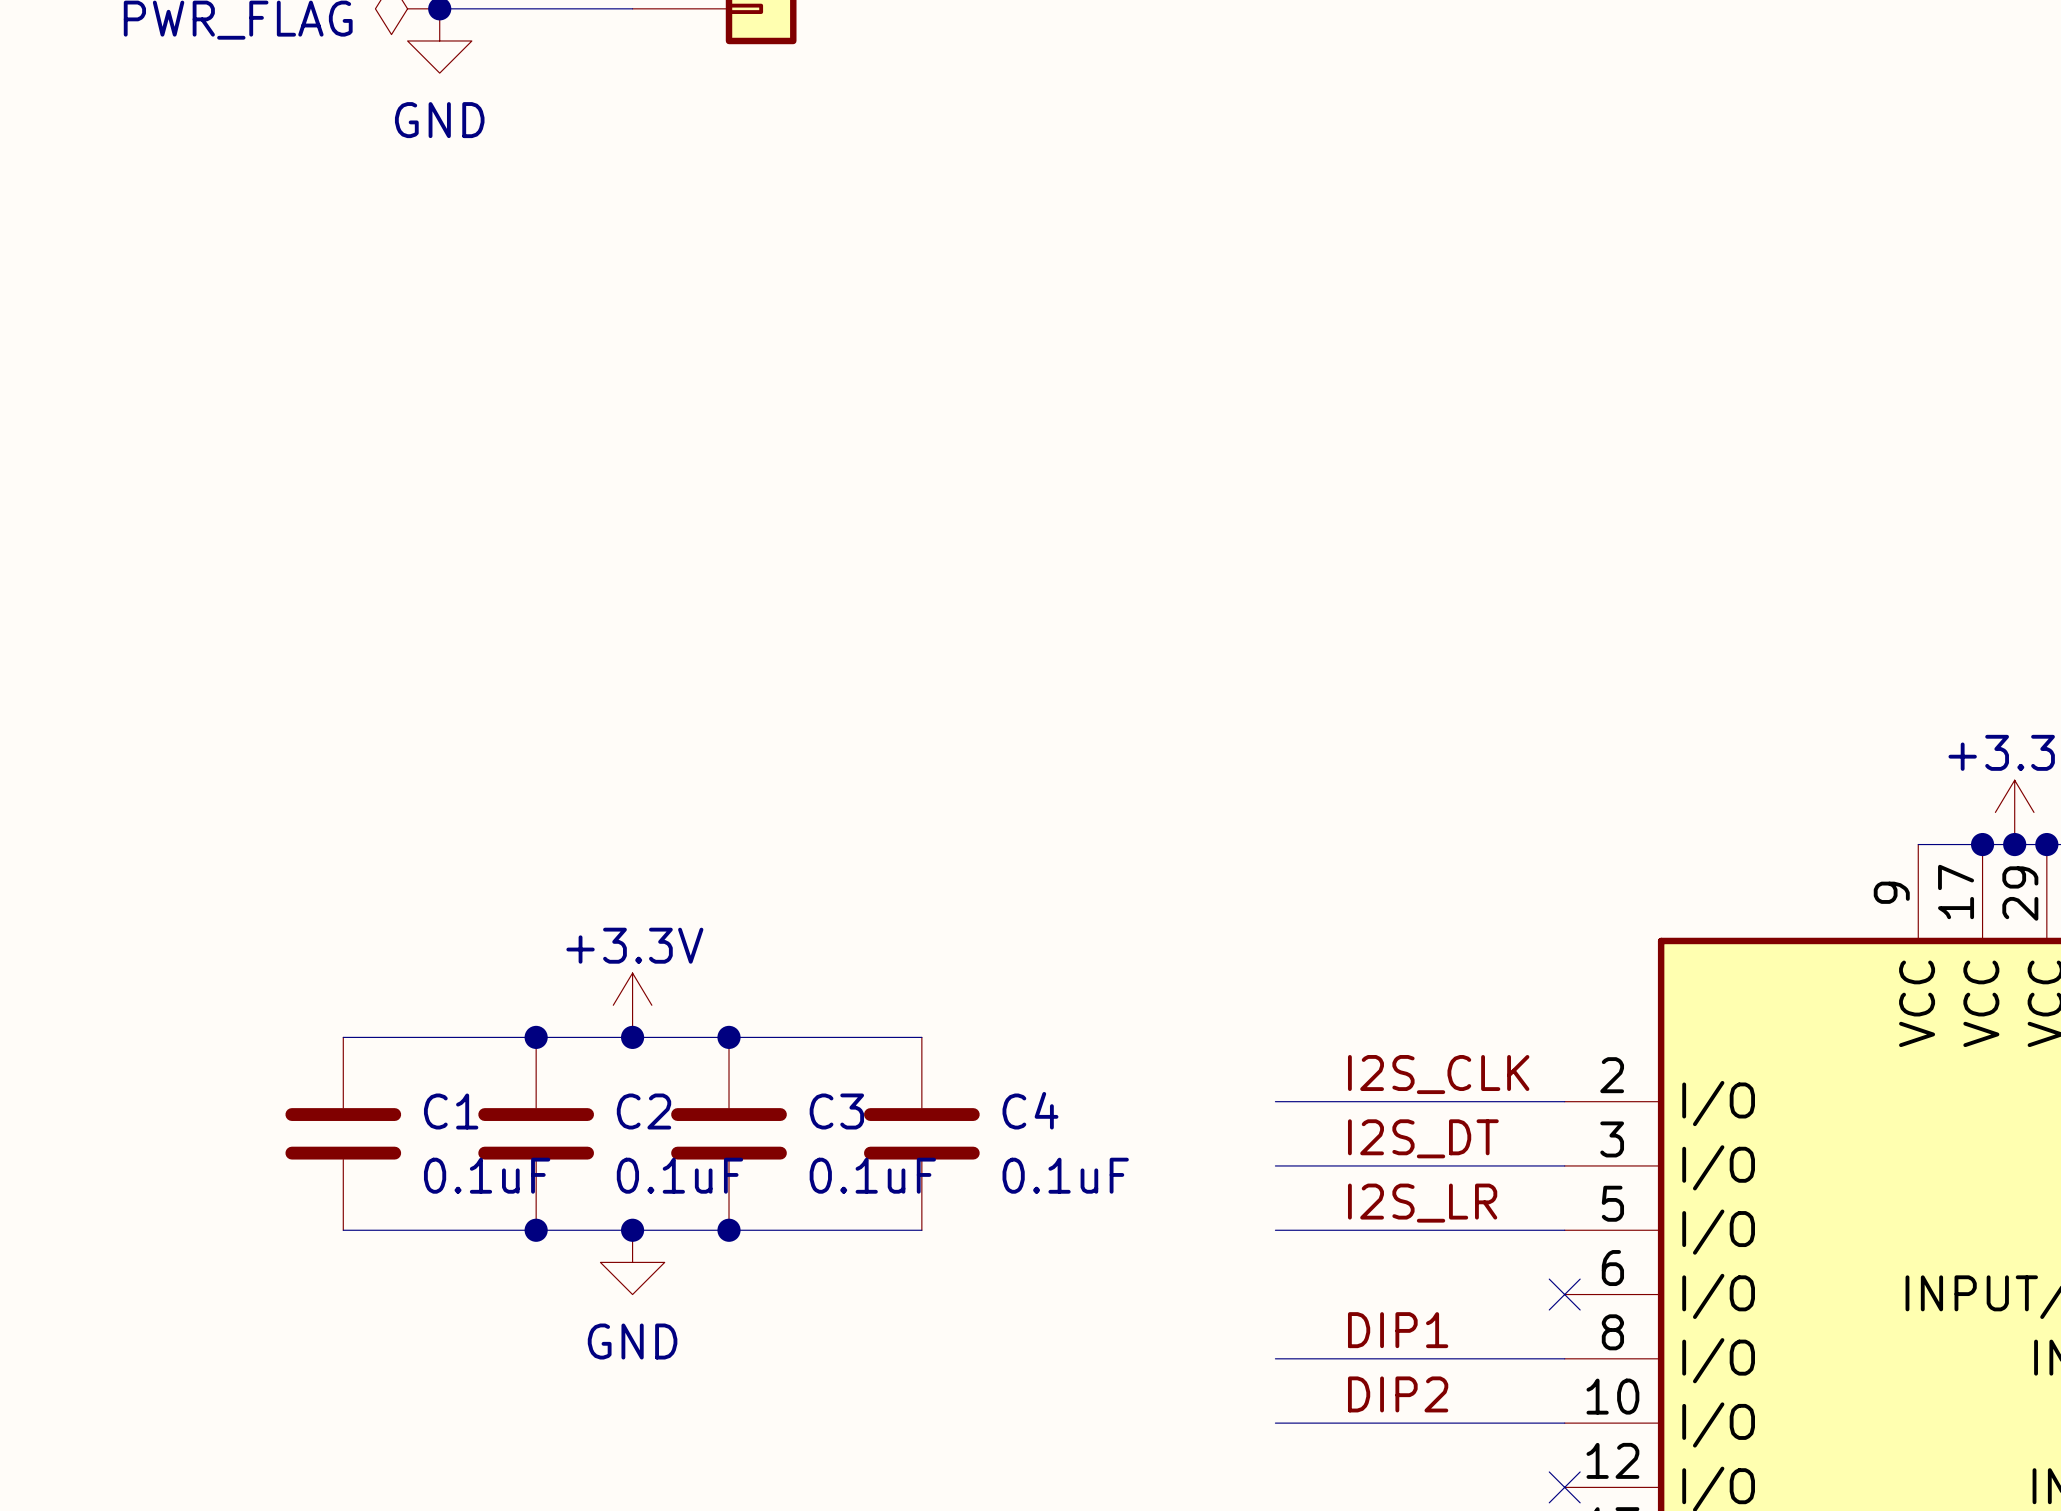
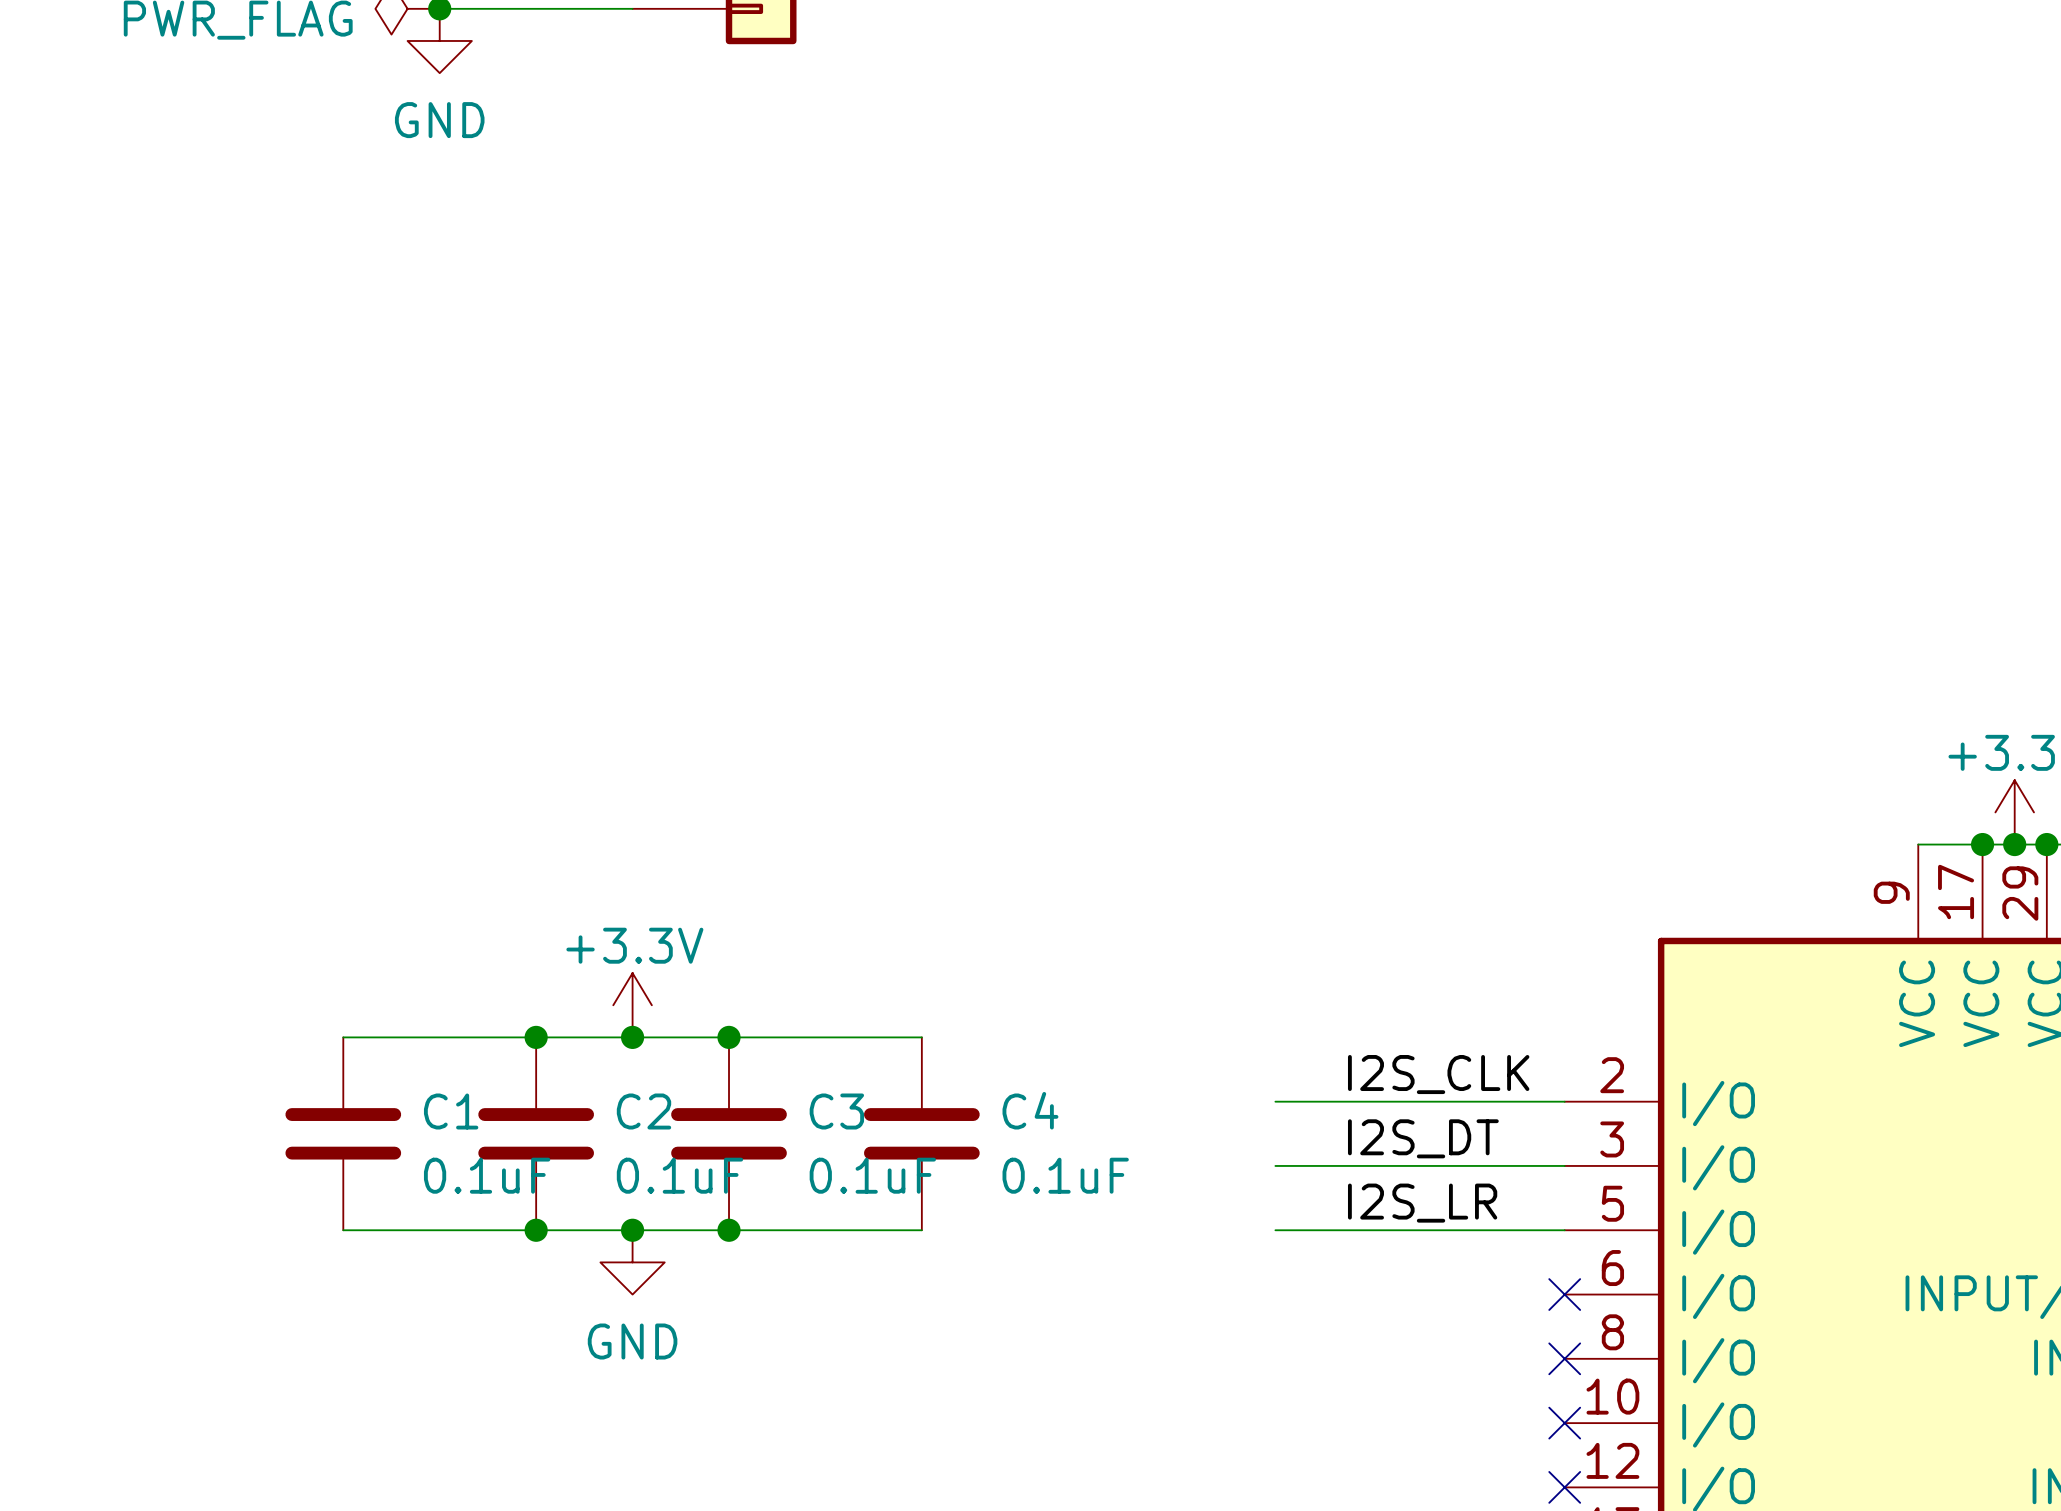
label: DIP1 (1398, 1330) -> none
wire: (1275, 1358) (1564, 1358) -> none
no-connect mark: none -> (1564, 1358)
label: DIP2 (1398, 1394) -> none
wire: (1275, 1423) (1564, 1423) -> none
no-connect mark: none -> (1564, 1423)

